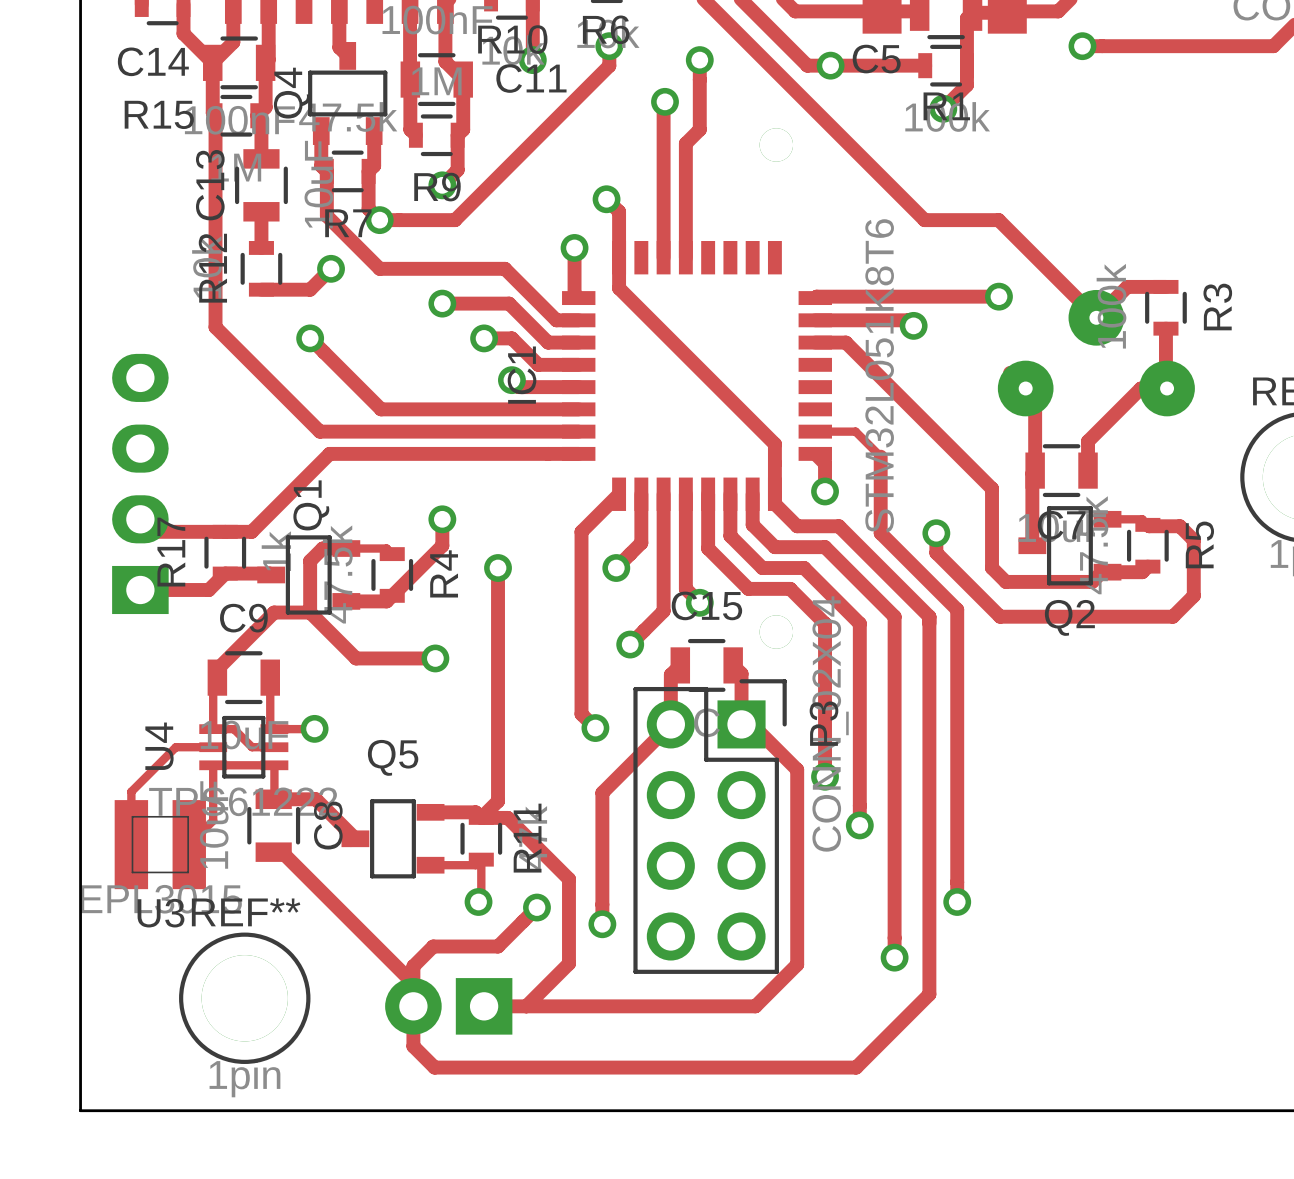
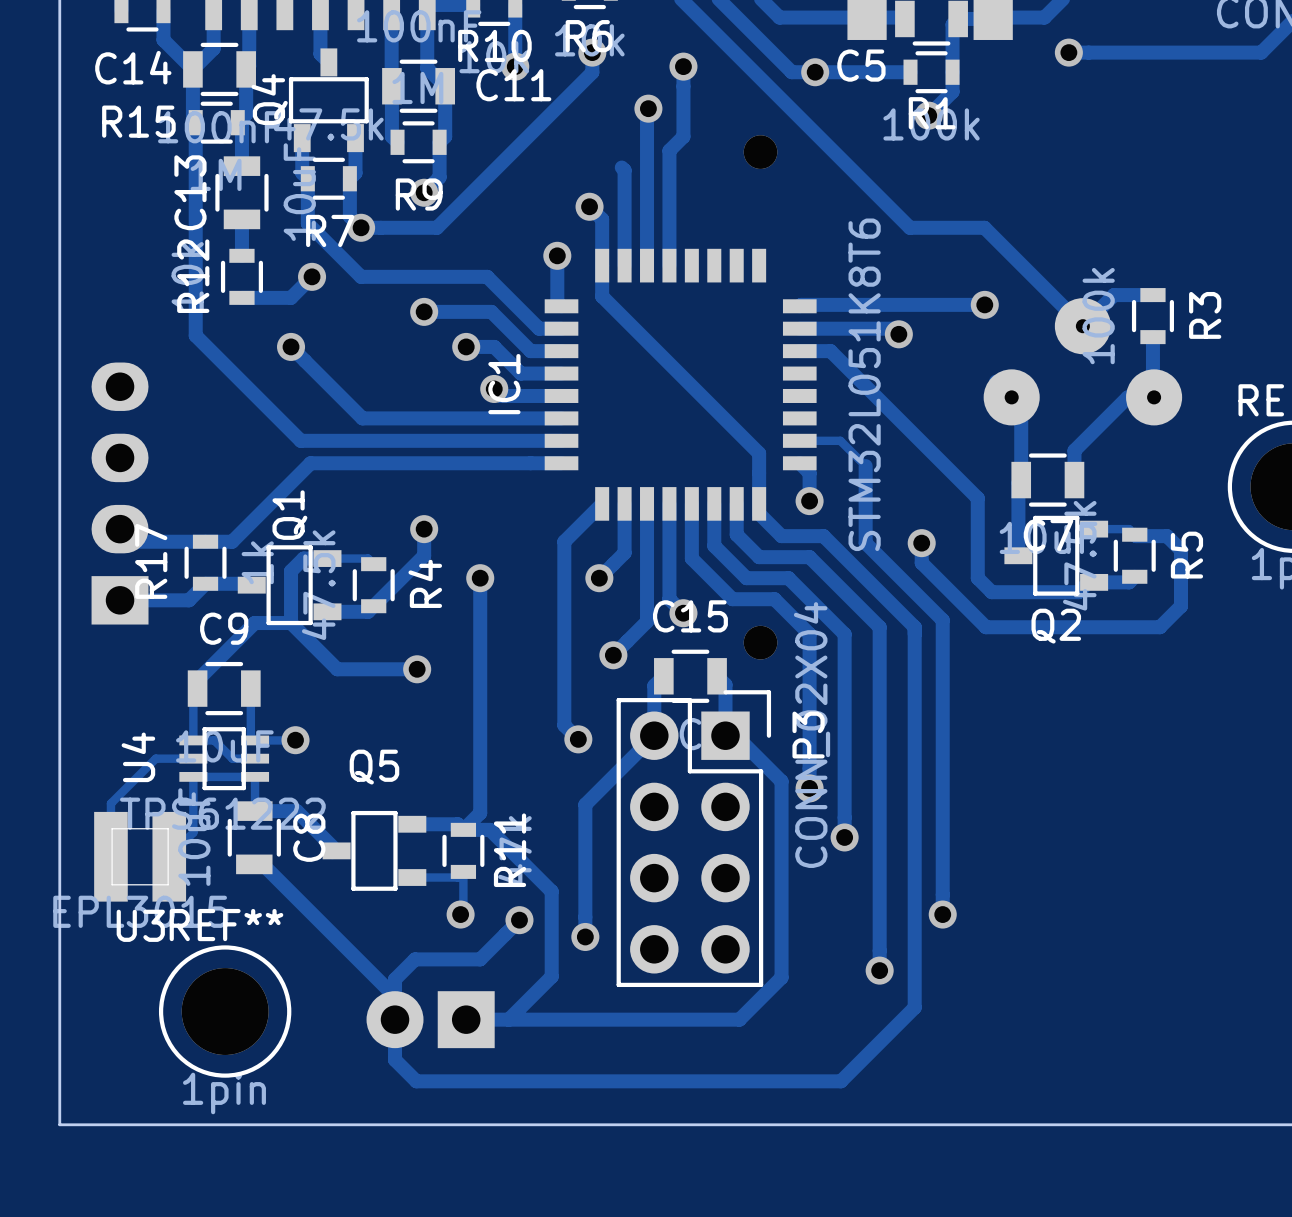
track: none -> (621, 167) (624, 170) (624, 265)

